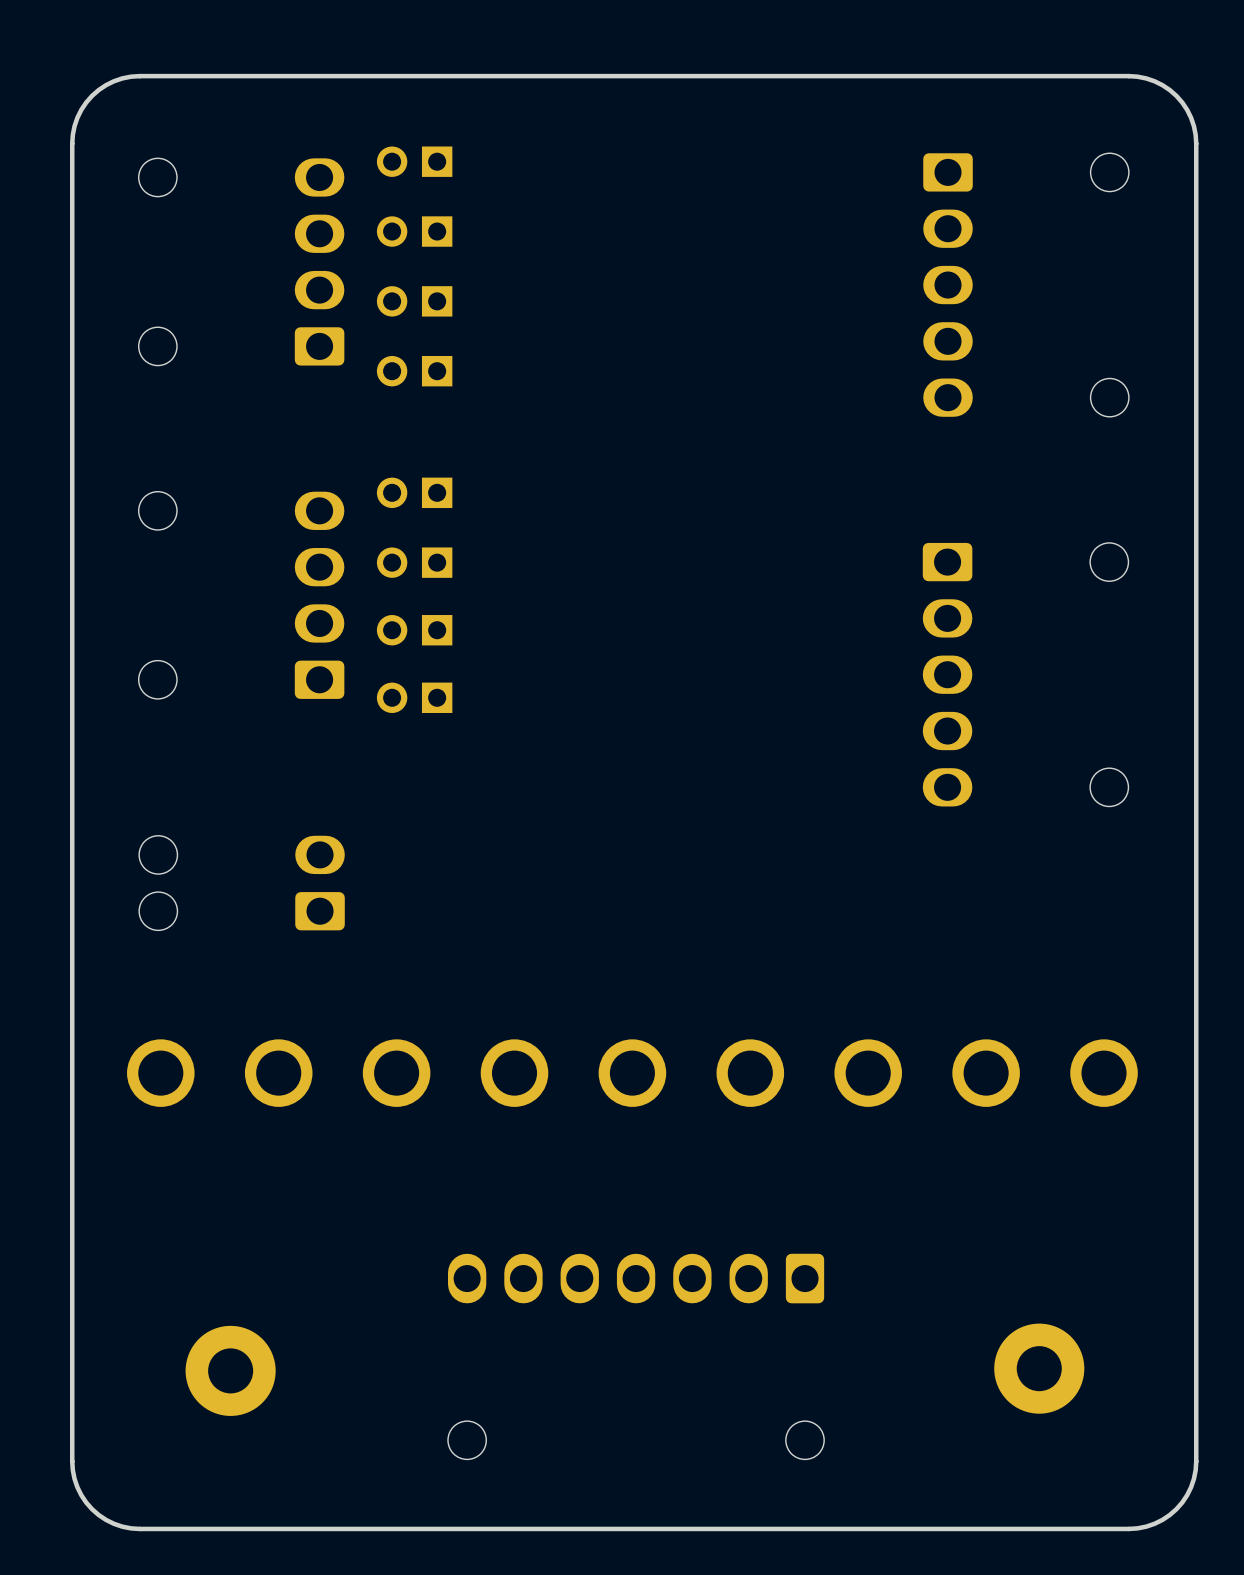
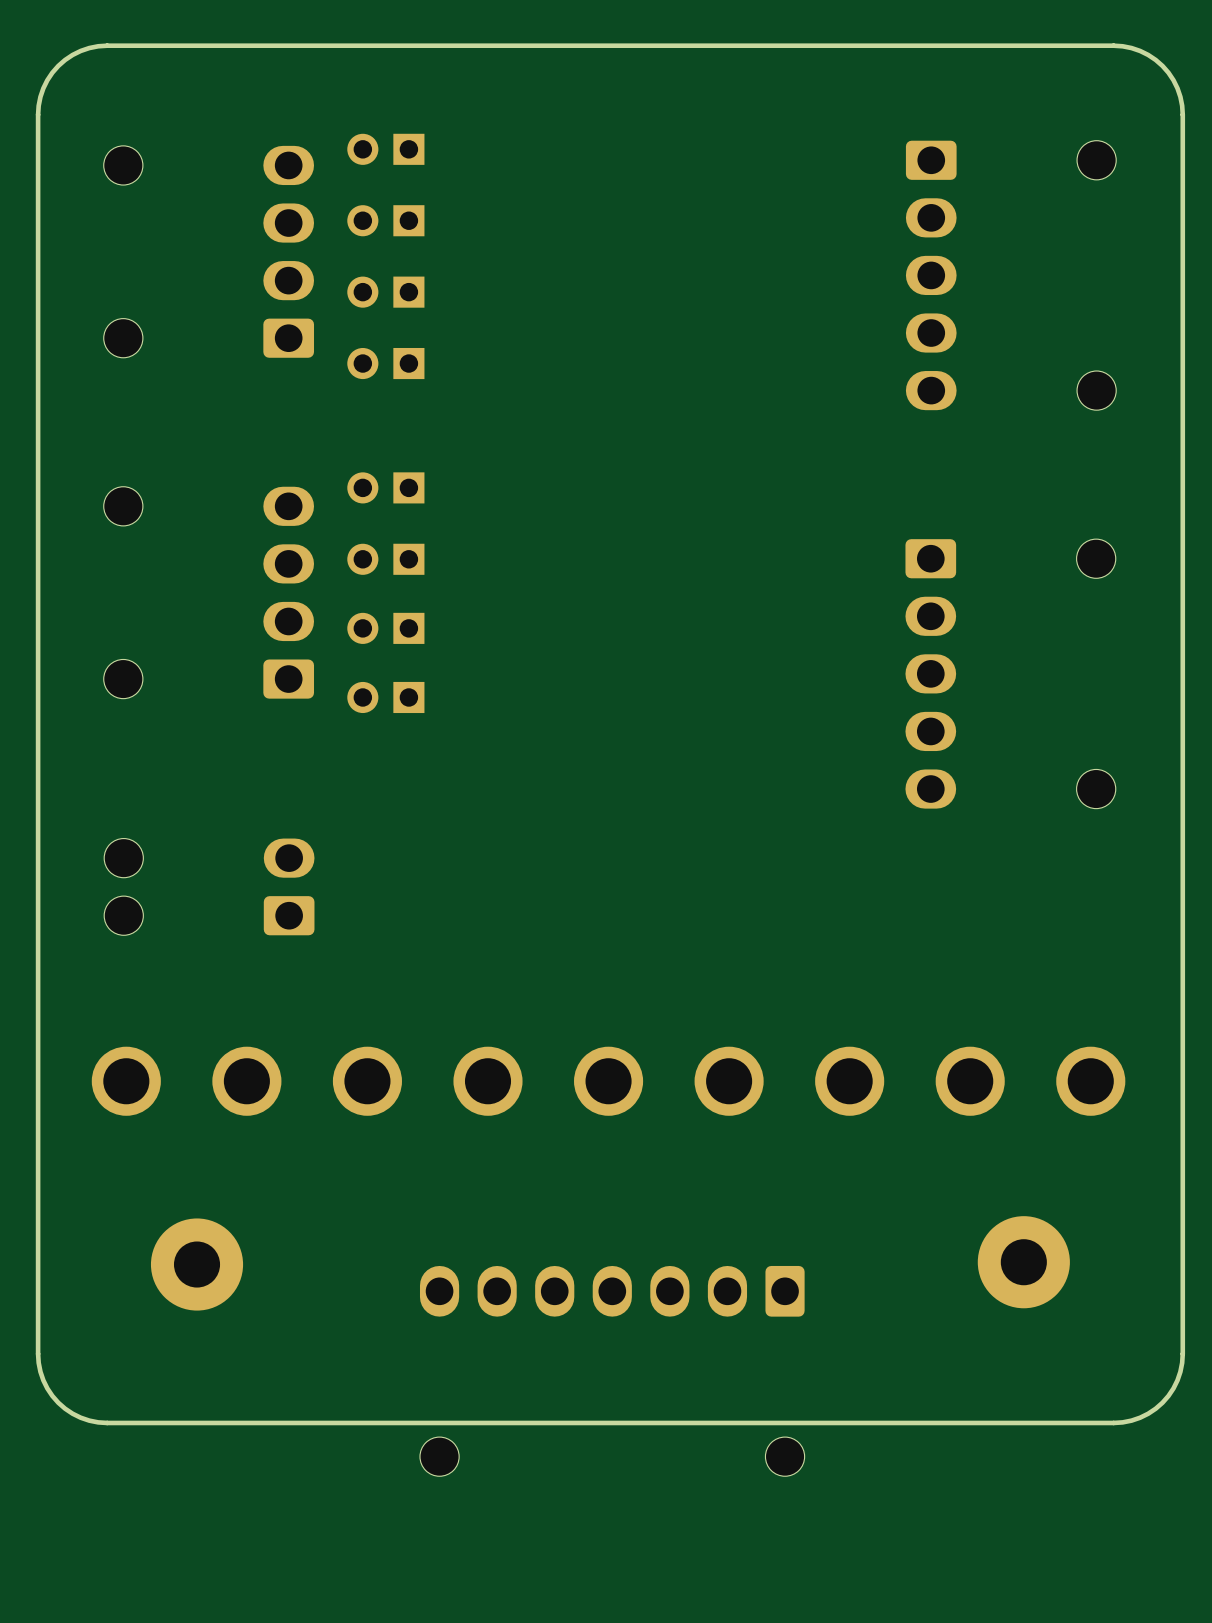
board edge: (1128, 76) (139, 76) (122, 78) (106, 85) (86, 102) (77, 117) (72, 143) (72, 1461) (74, 1478) (81, 1495) (98, 1515) (113, 1523) (139, 1528) (1128, 1528) (1154, 1523) (1169, 1515) (1182, 1502) (1193, 1478) (1196, 1461) (1196, 143) (1191, 117) (1176, 95) (1154, 81) (1128, 76) -> (1113, 45) (1140, 50) (1162, 65) (1177, 88) (1182, 114) (1182, 1353) (1180, 1371) (1168, 1395) (1155, 1408) (1140, 1417) (1113, 1422) (107, 1422) (80, 1417) (65, 1408) (52, 1395) (43, 1380) (38, 1353) (38, 114) (40, 96) (52, 72) (72, 54) (89, 48) (107, 45) (1113, 45)
part position: (1039, 1368) -> (1023, 1262)
part position: (230, 1370) -> (197, 1264)

